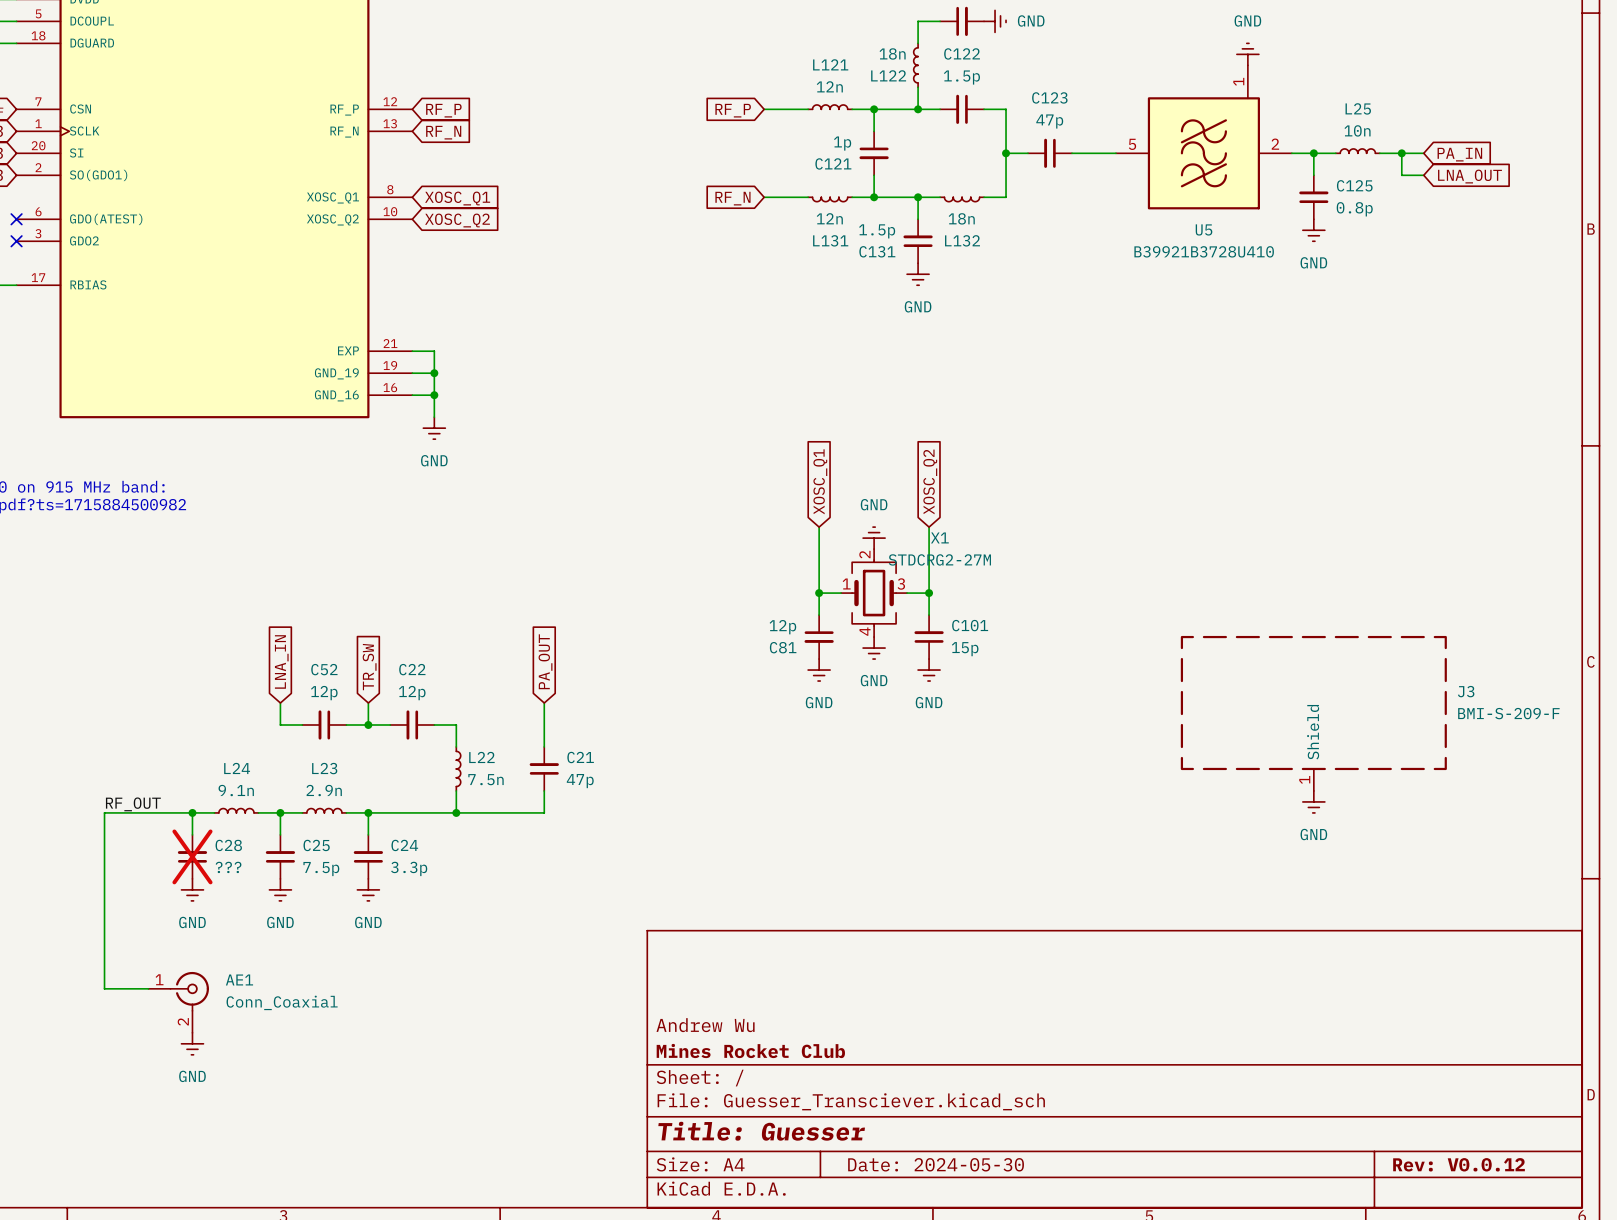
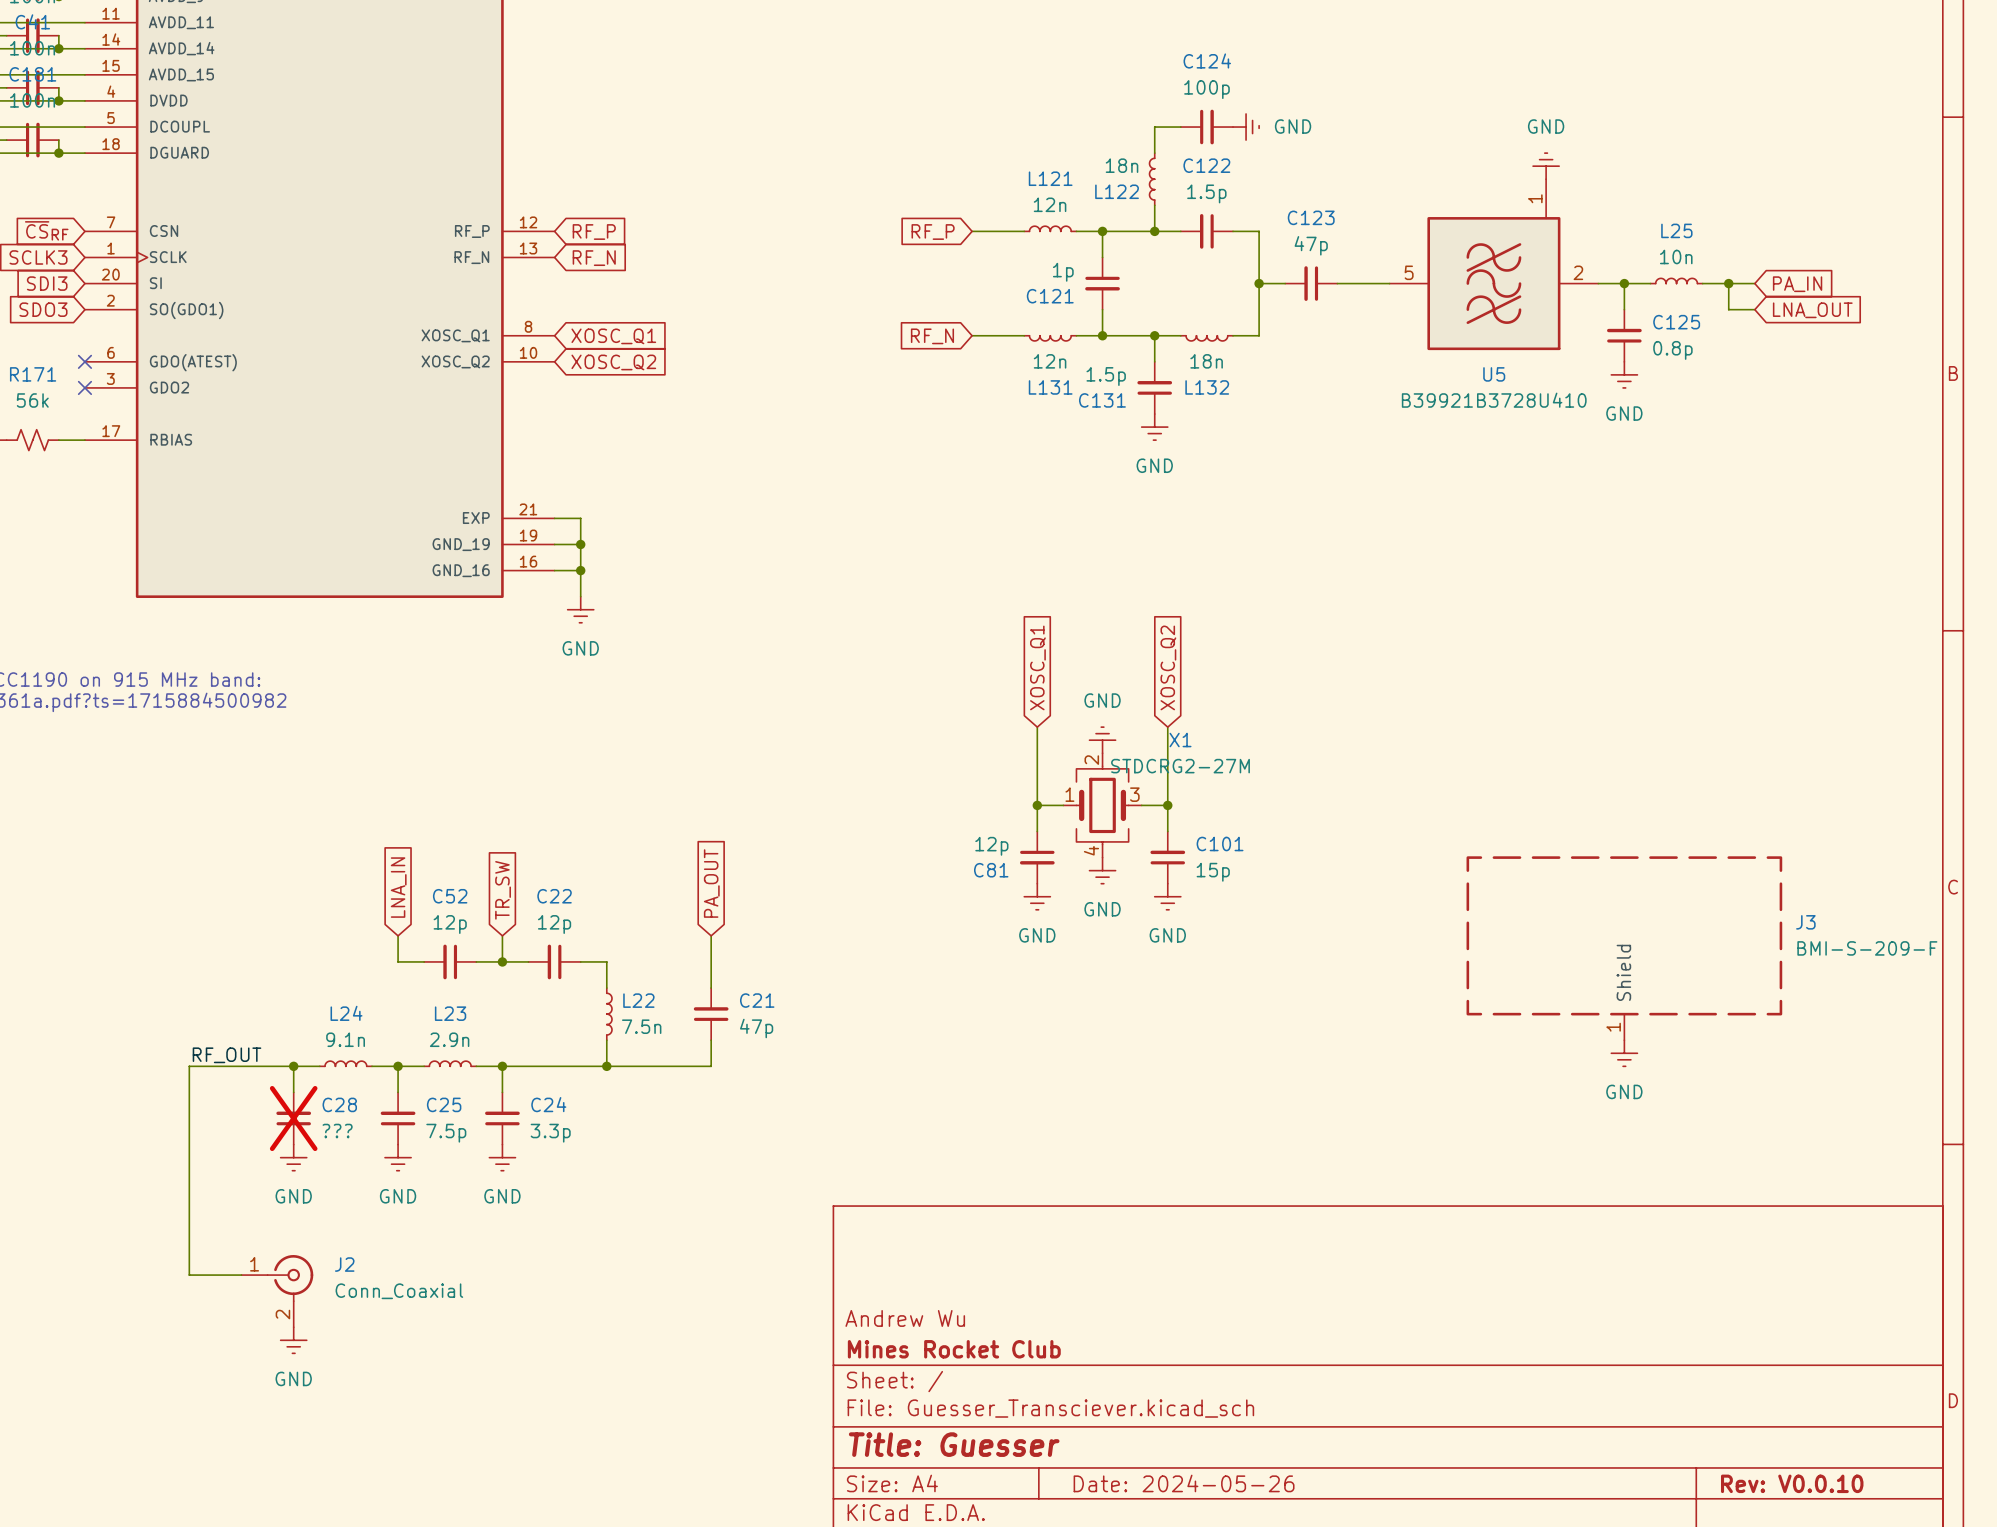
AE1 name: AE1 (239, 979) -> J2 (344, 1264)
title block: Date: 2024-05-30 (936, 1164) -> Date: 2024-05-26 (1184, 1483)
title block: Rev: V0.0.12 (1459, 1164) -> Rev: V0.0.10 (1792, 1483)

